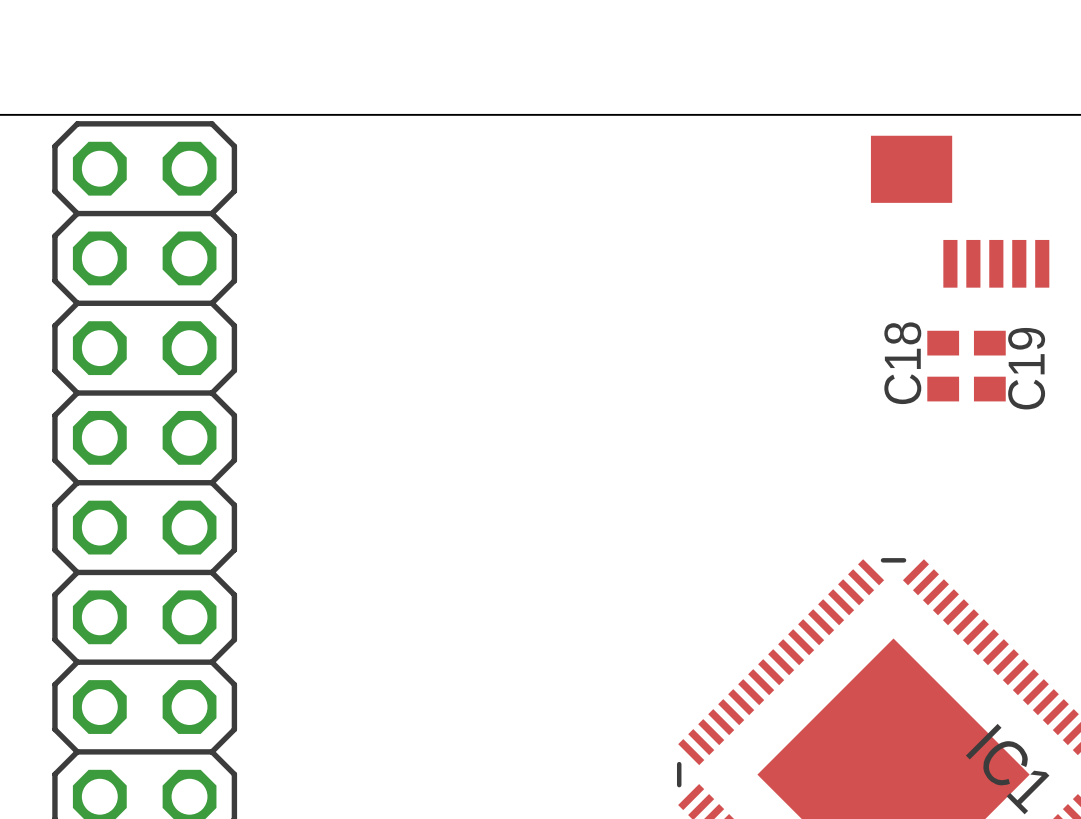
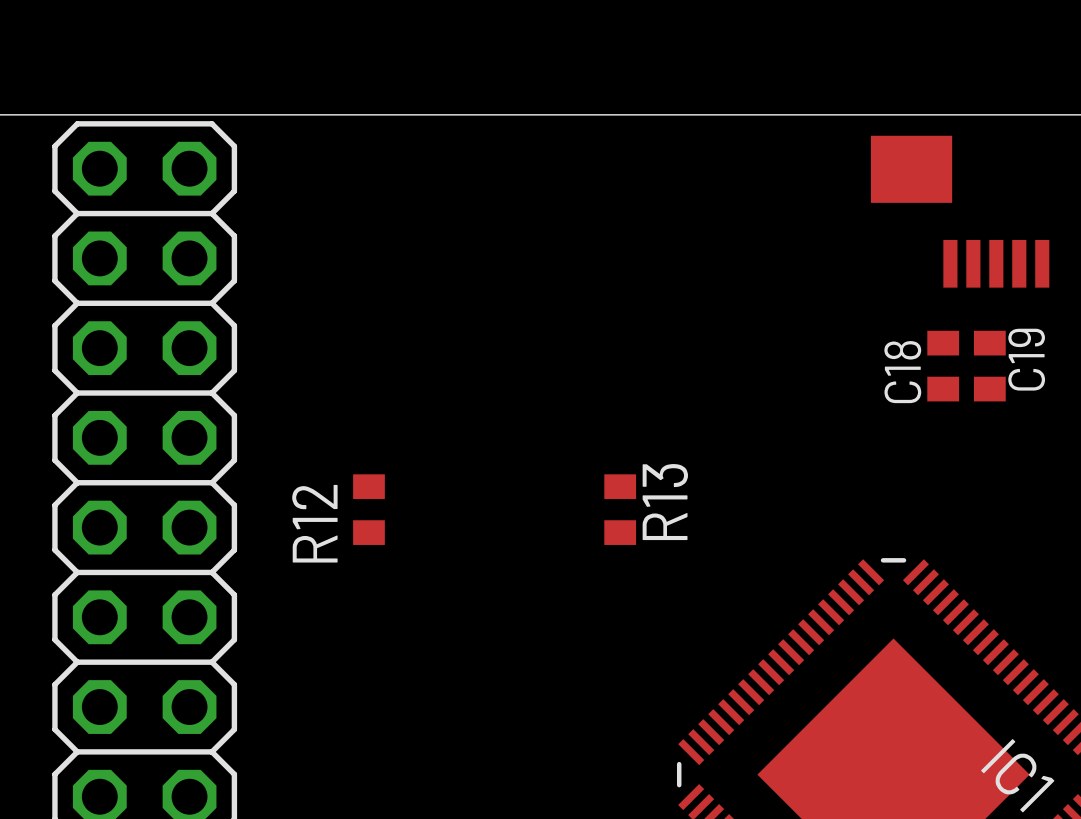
R12: none -> (368, 509)
R13: none -> (620, 509)

